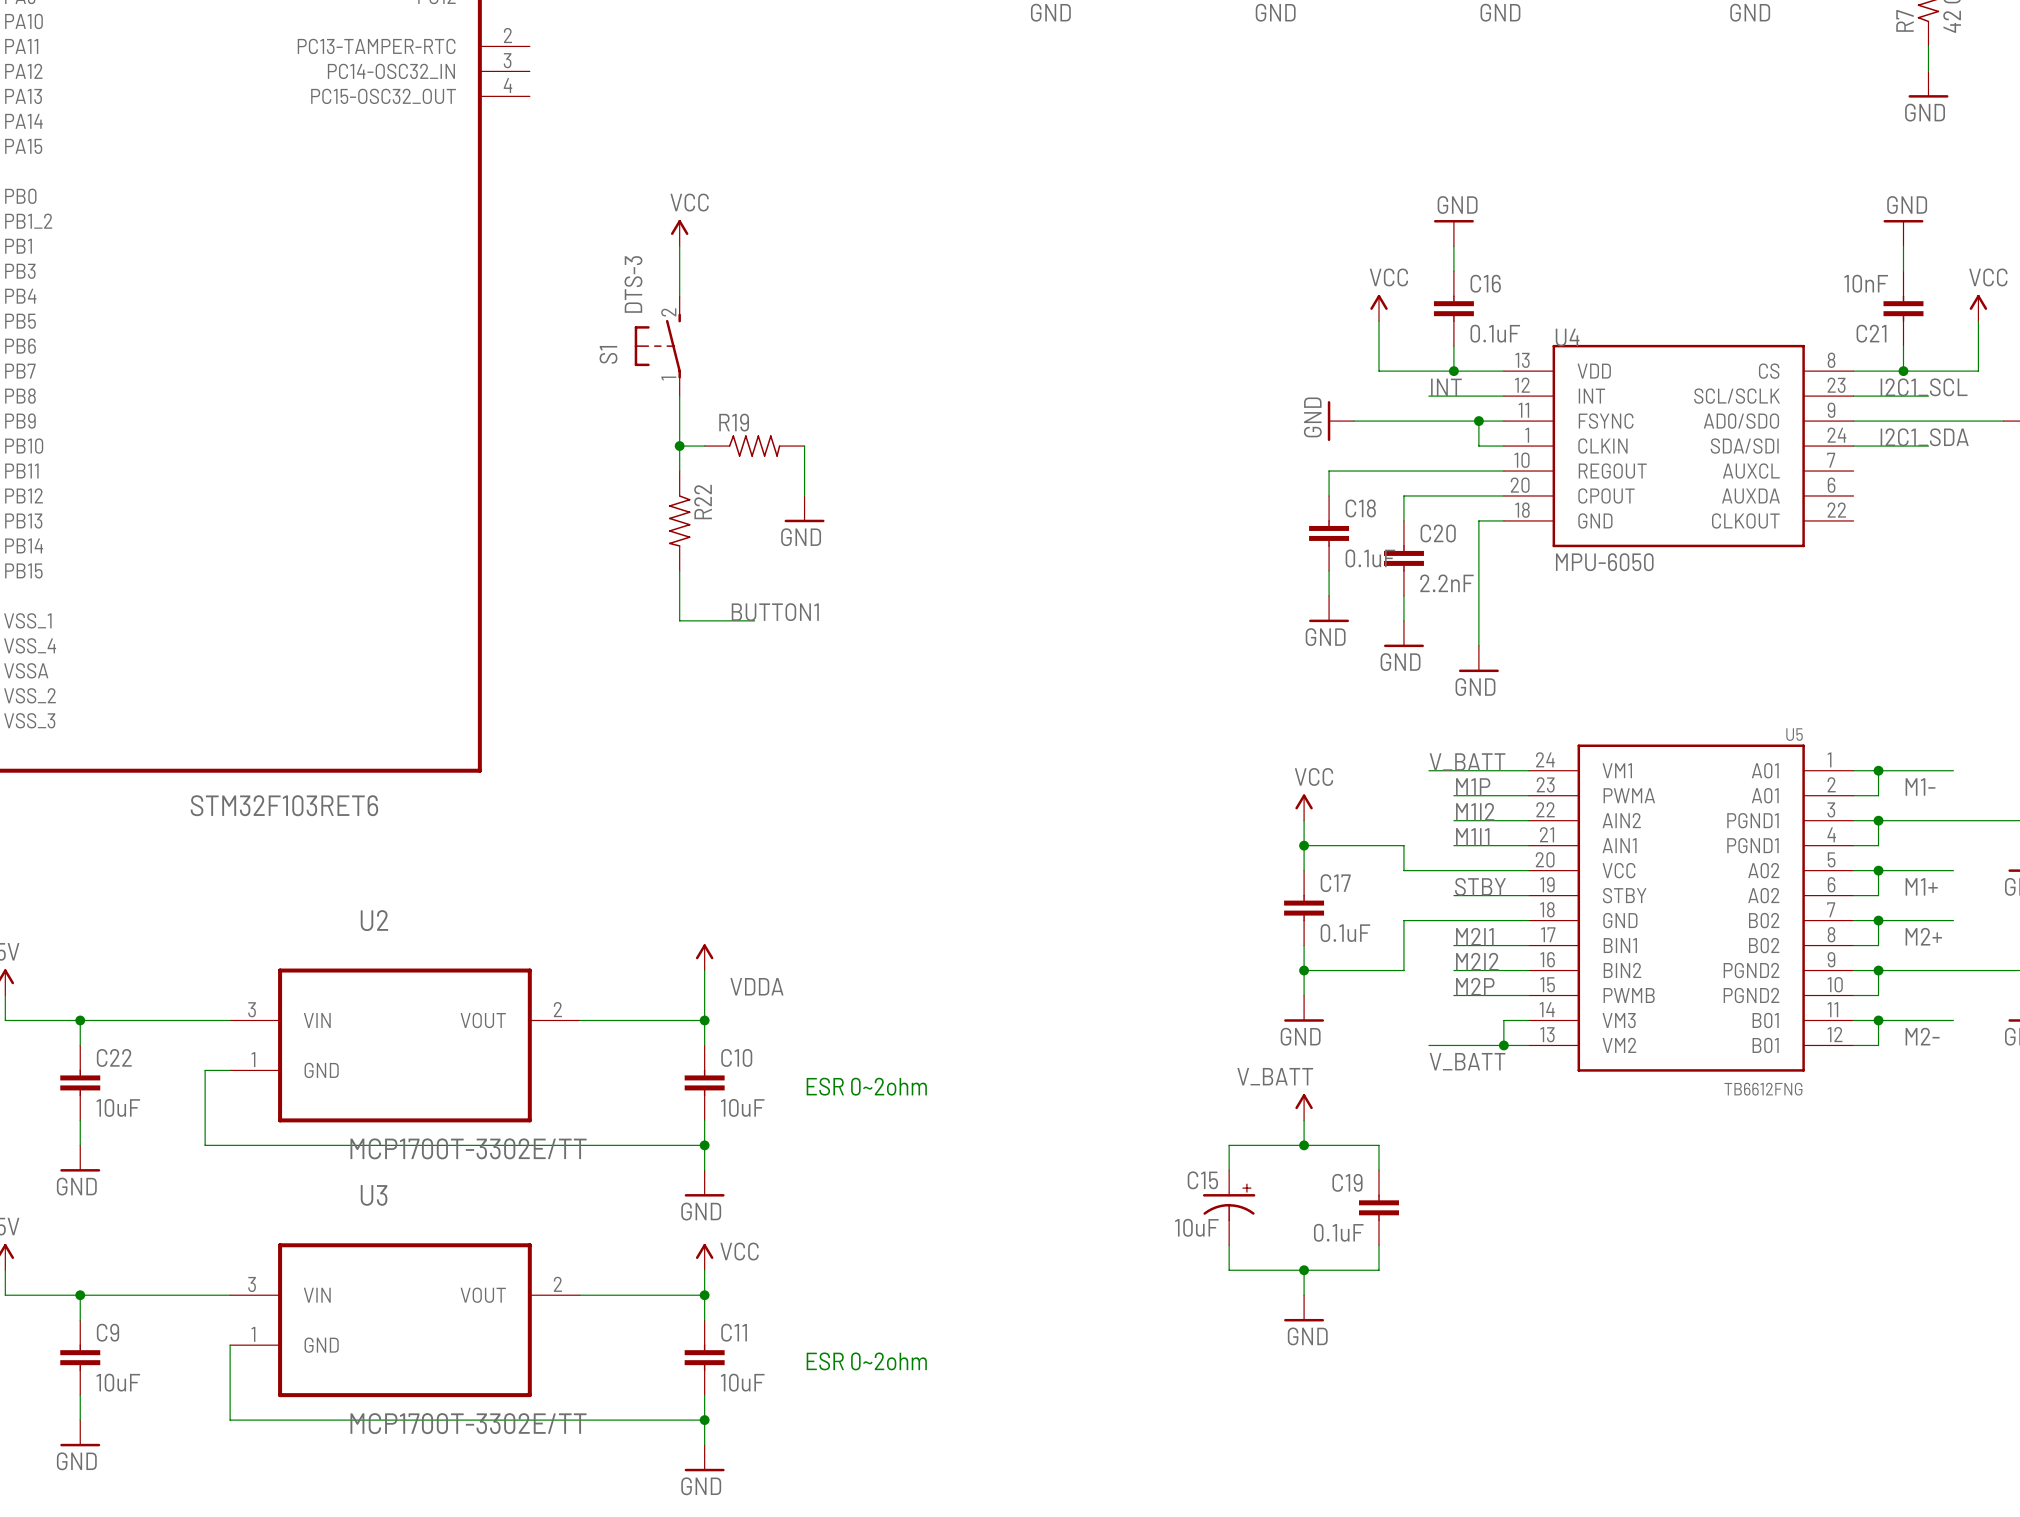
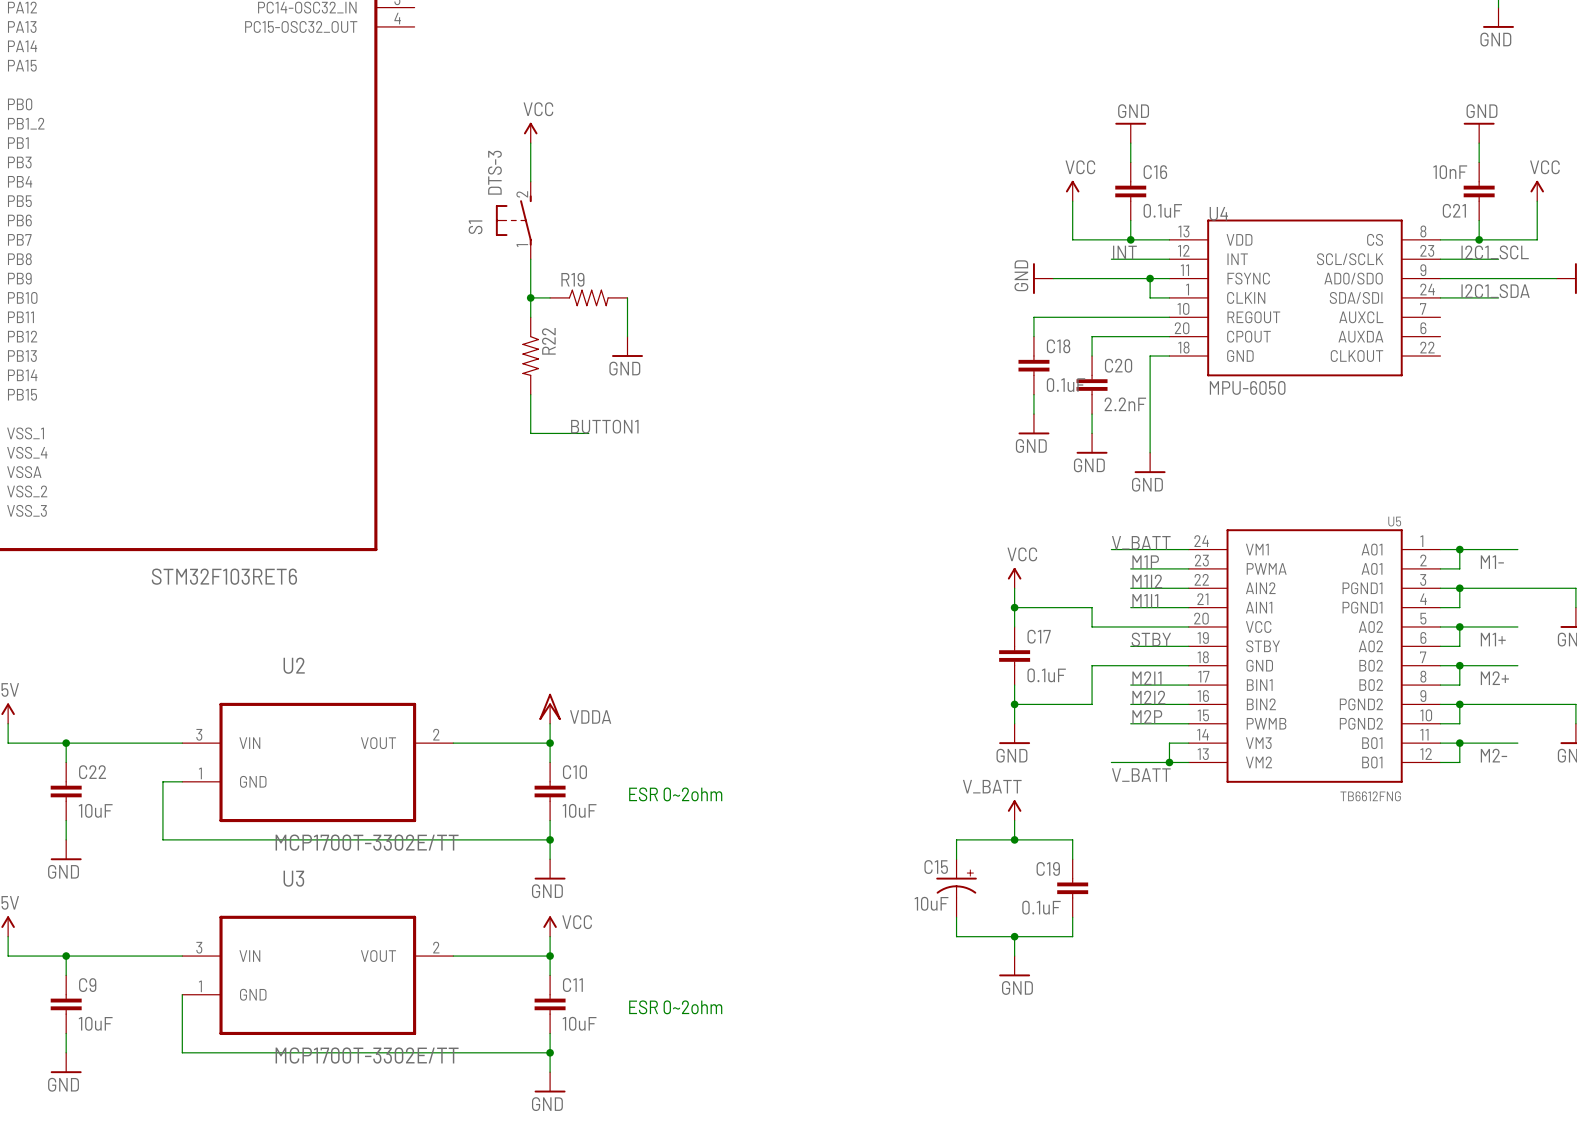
power symbol: VDDA (704, 957) -> none
power symbol: none -> VDDA (550, 708)

